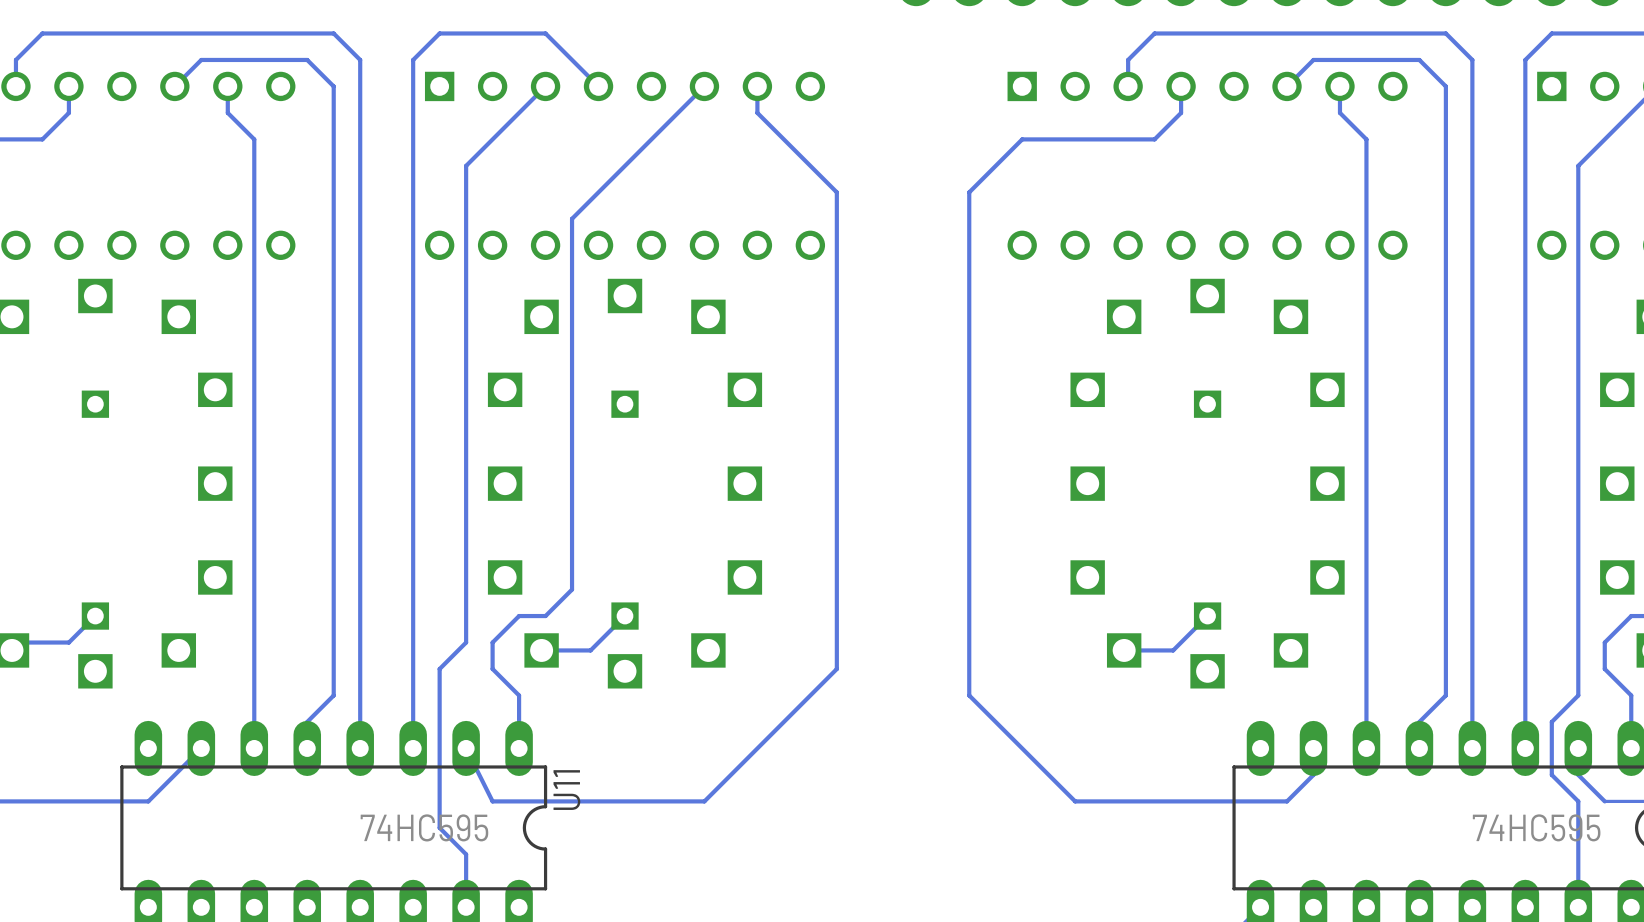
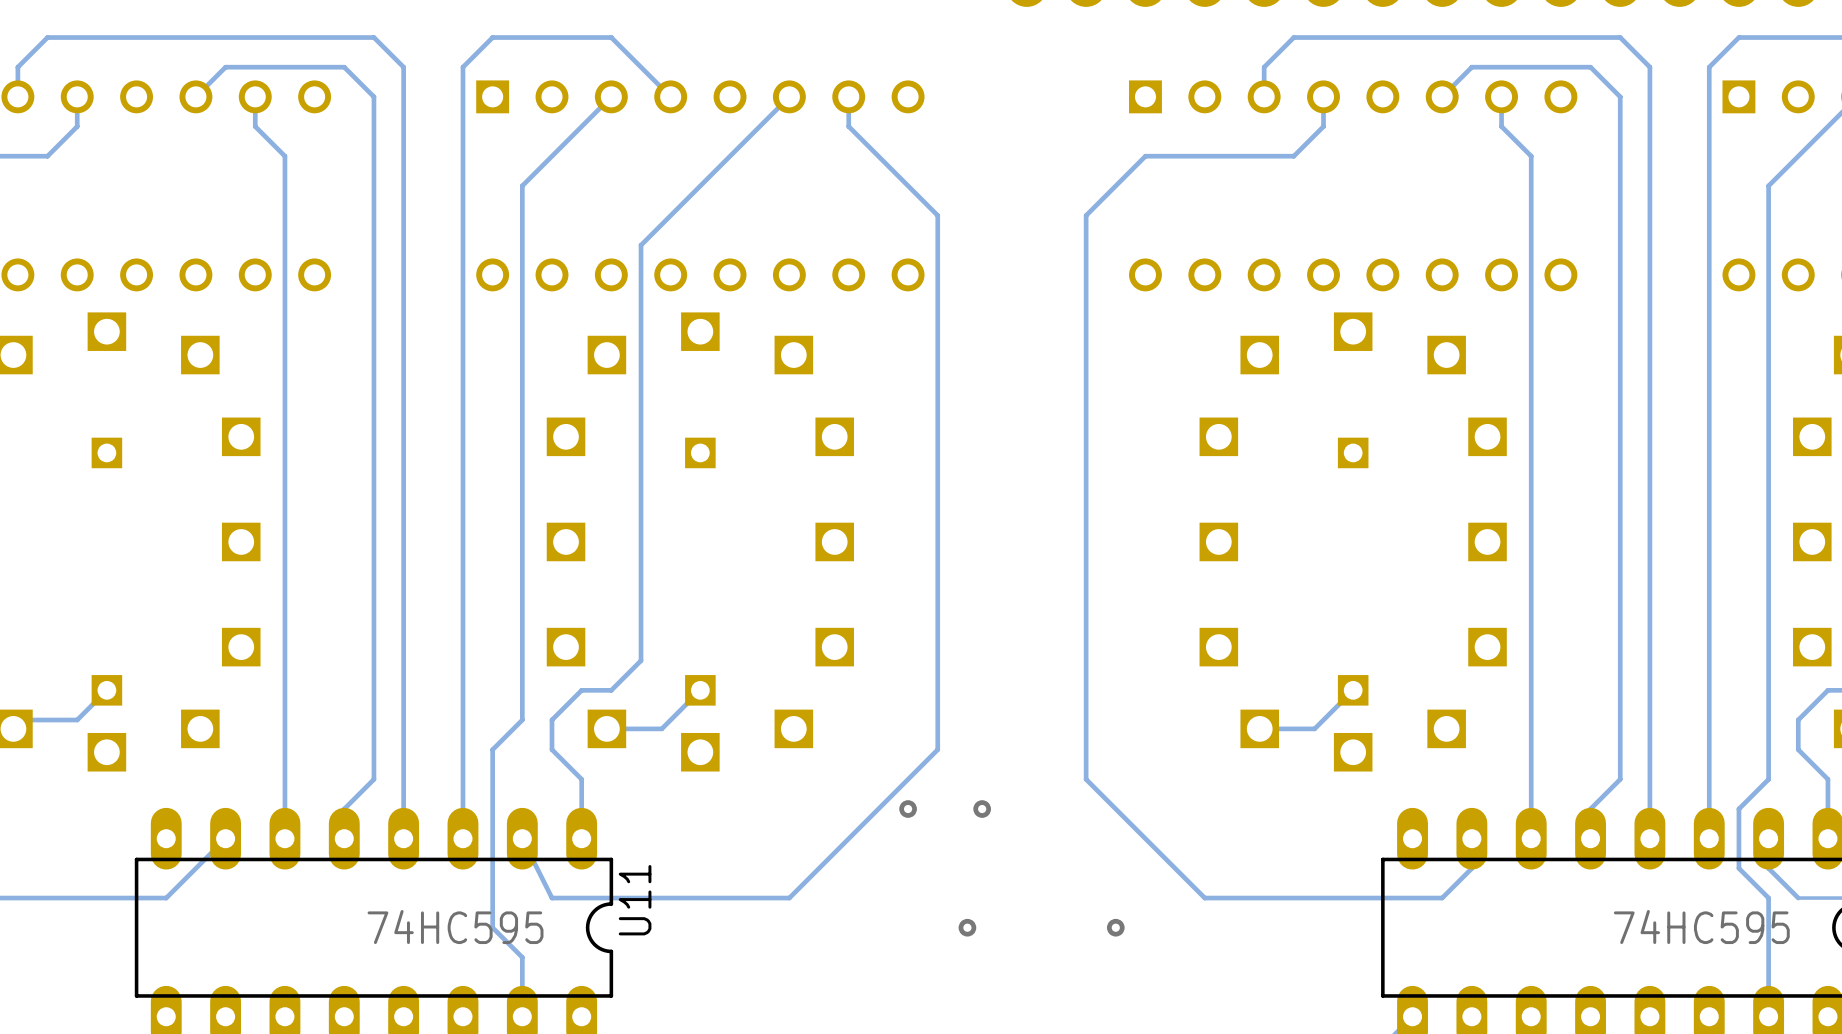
via: none -> (908, 809)
via: none -> (982, 809)
via: none -> (967, 927)
via: none -> (1115, 927)

